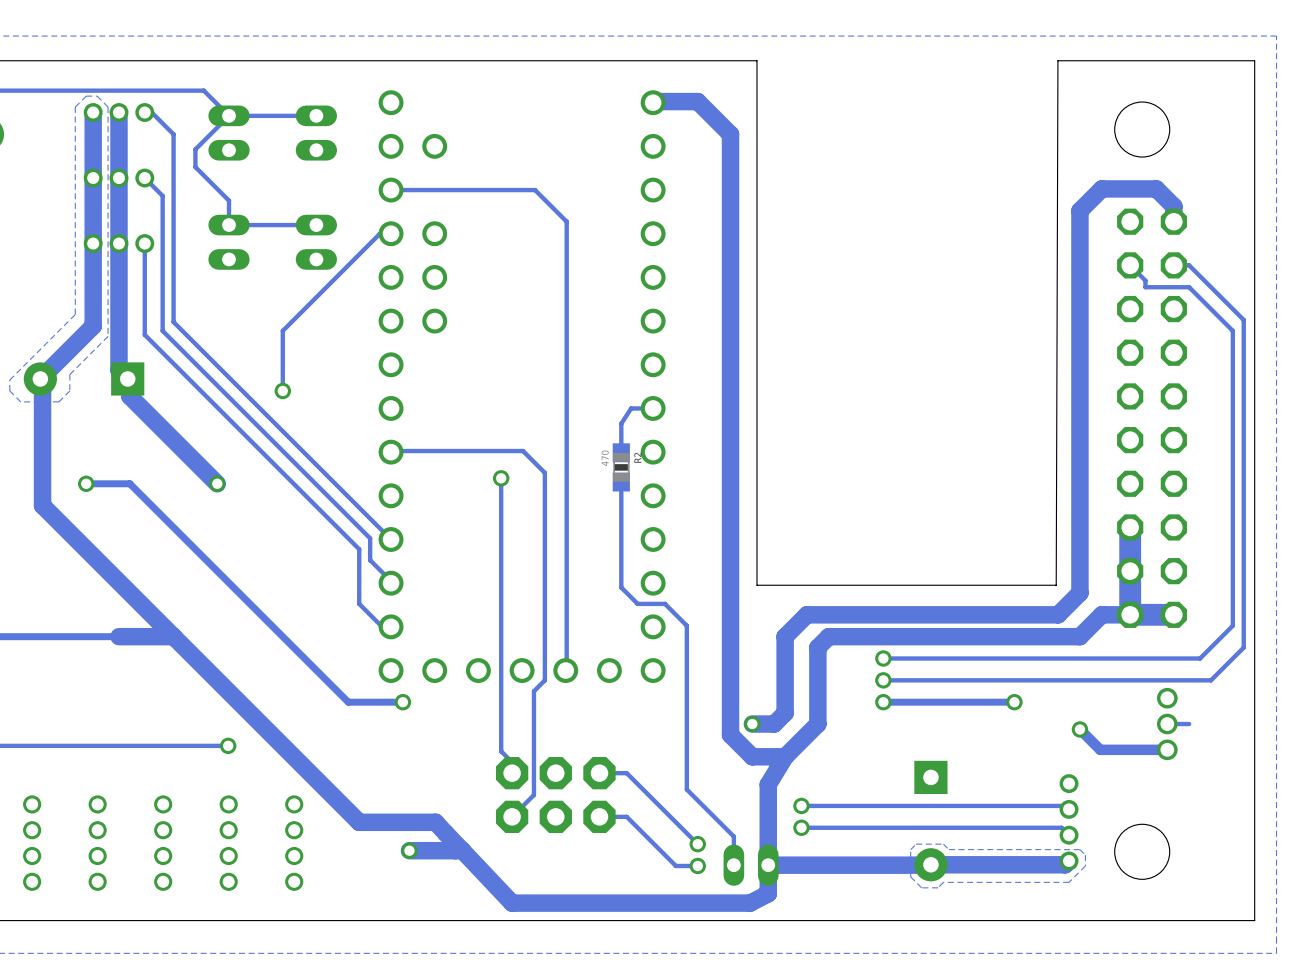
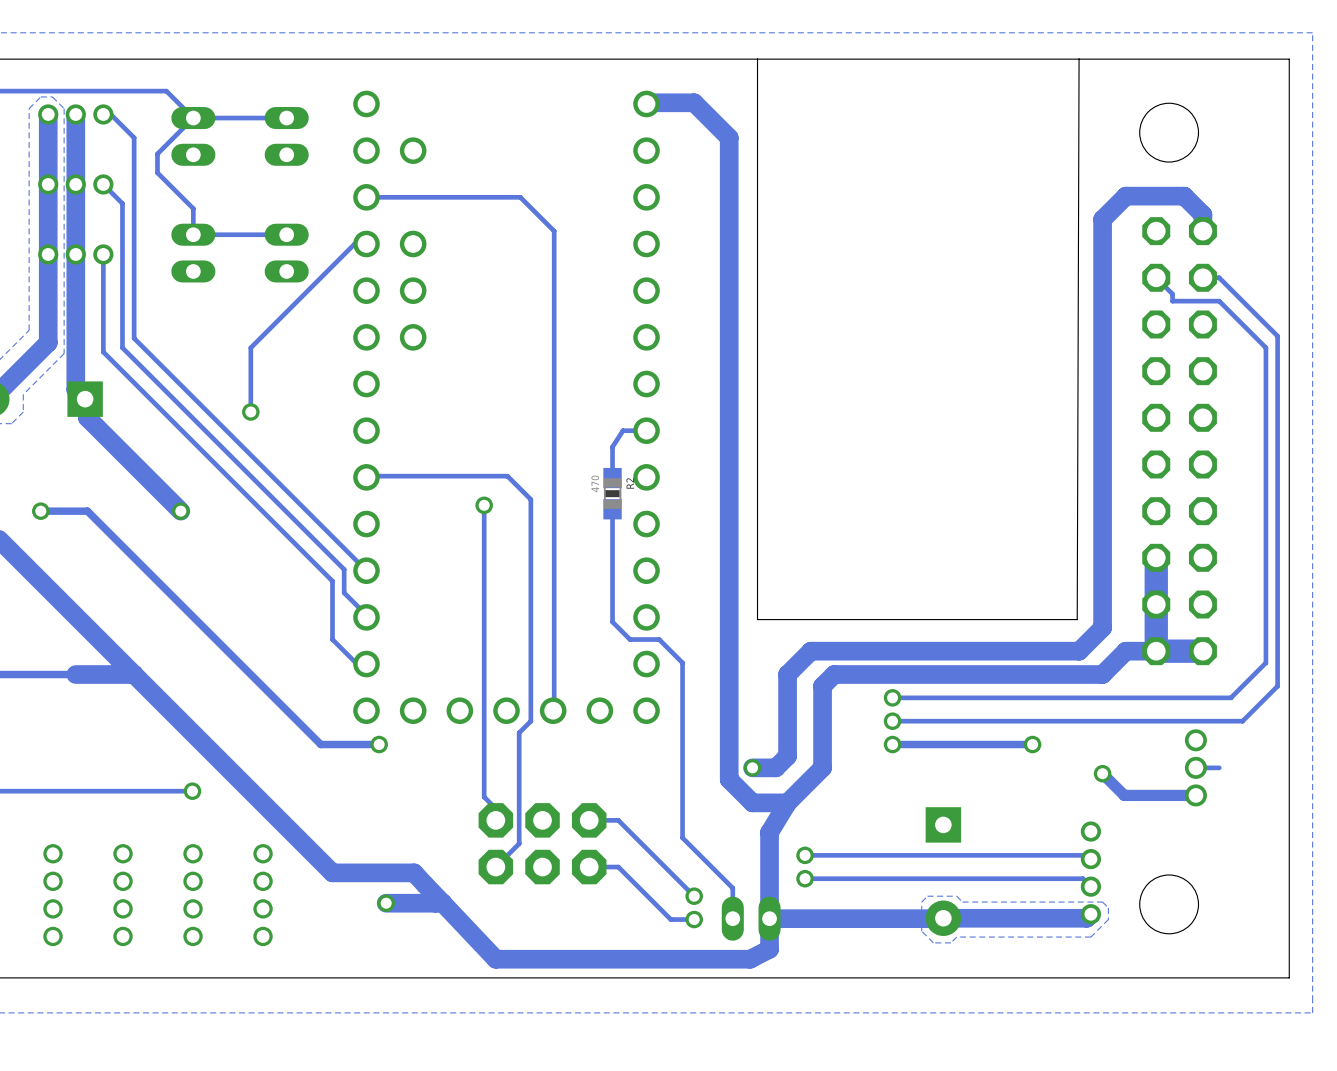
board edge: none -> (1079, 59) (757, 59)

